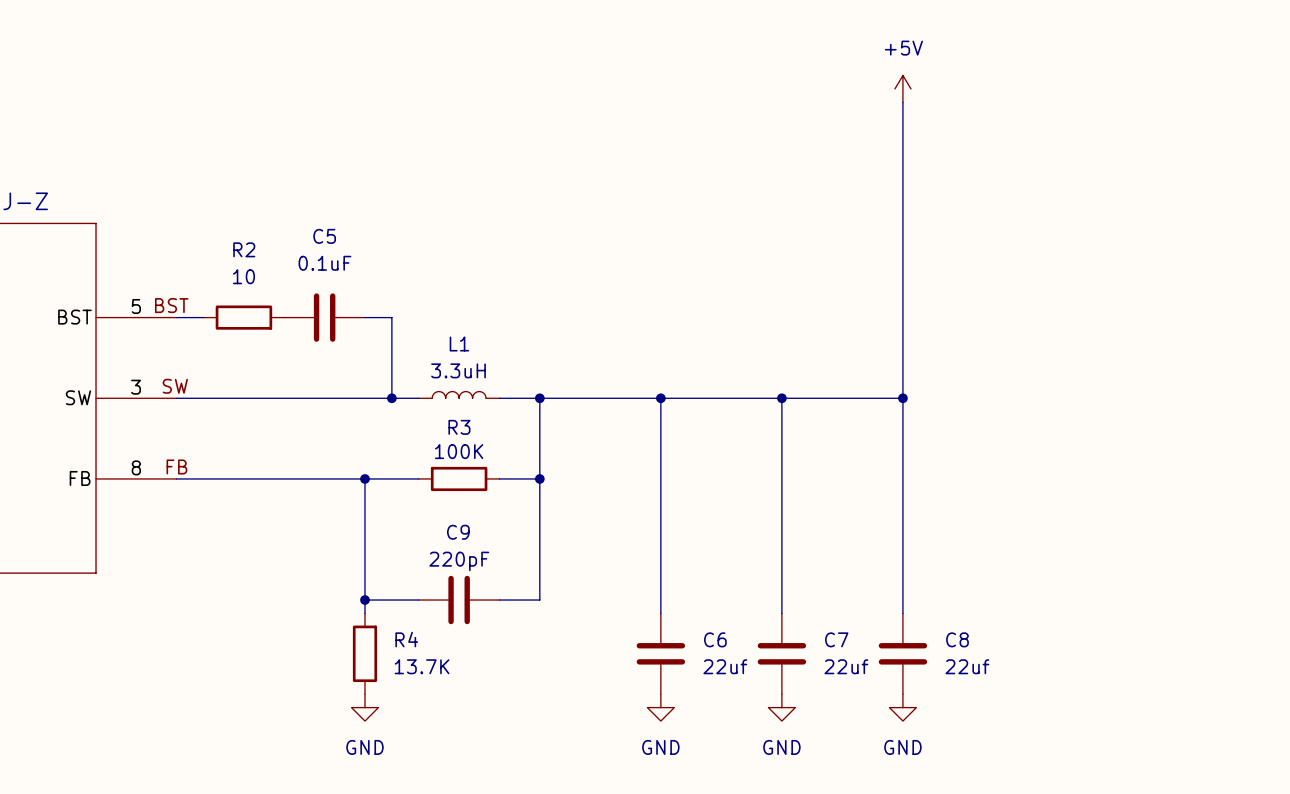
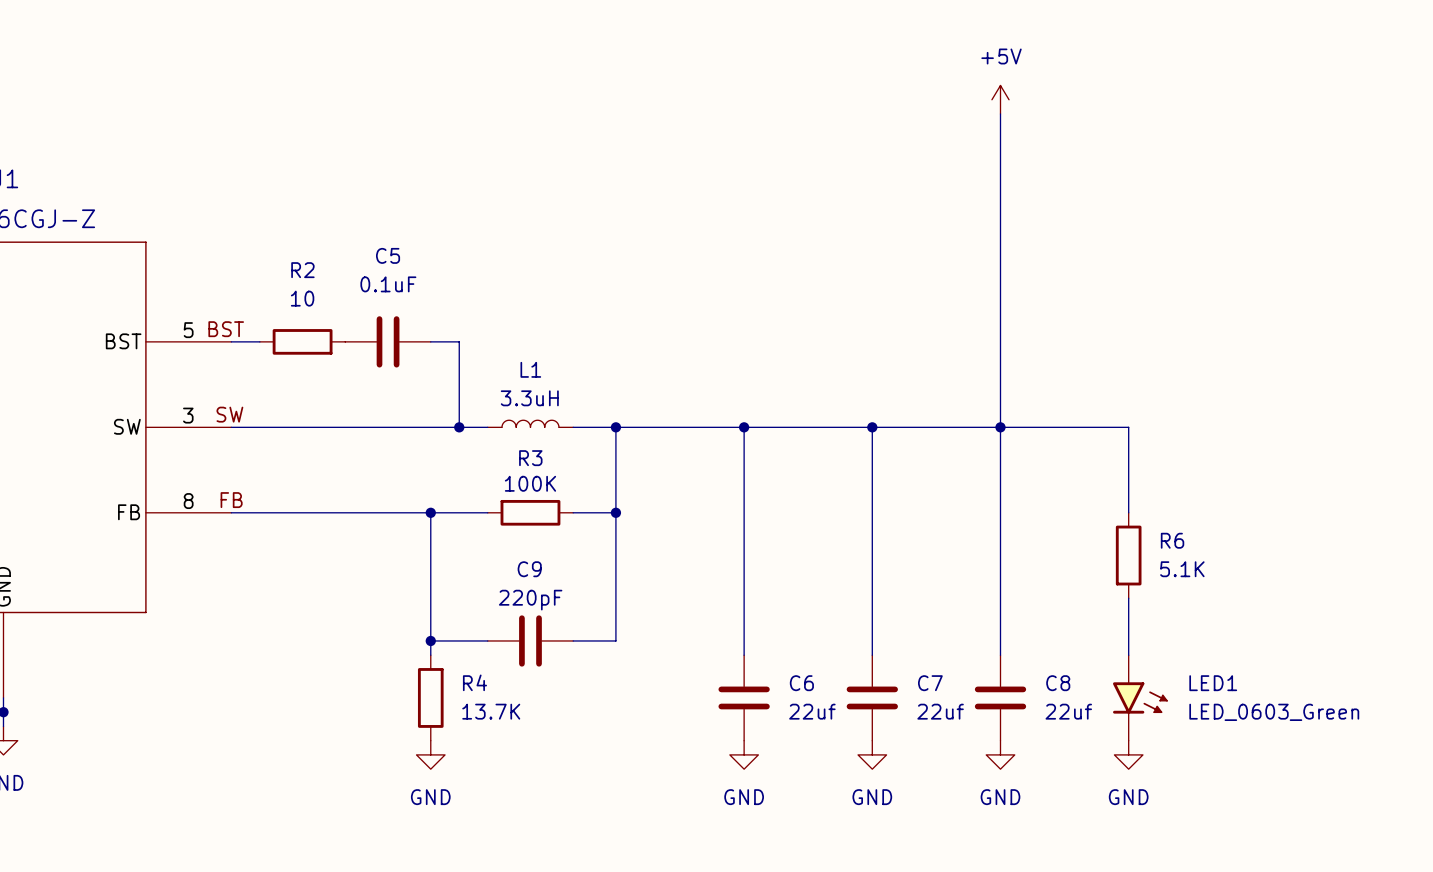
wire: none -> (1000, 427) (1128, 427) (1128, 512)
R6: none -> 5.1K (1128, 555)
wire: none -> (1128, 598) (1128, 655)
LED1: none -> LED_0603_Green (1140, 697)
power symbol: none -> GND (1128, 754)

